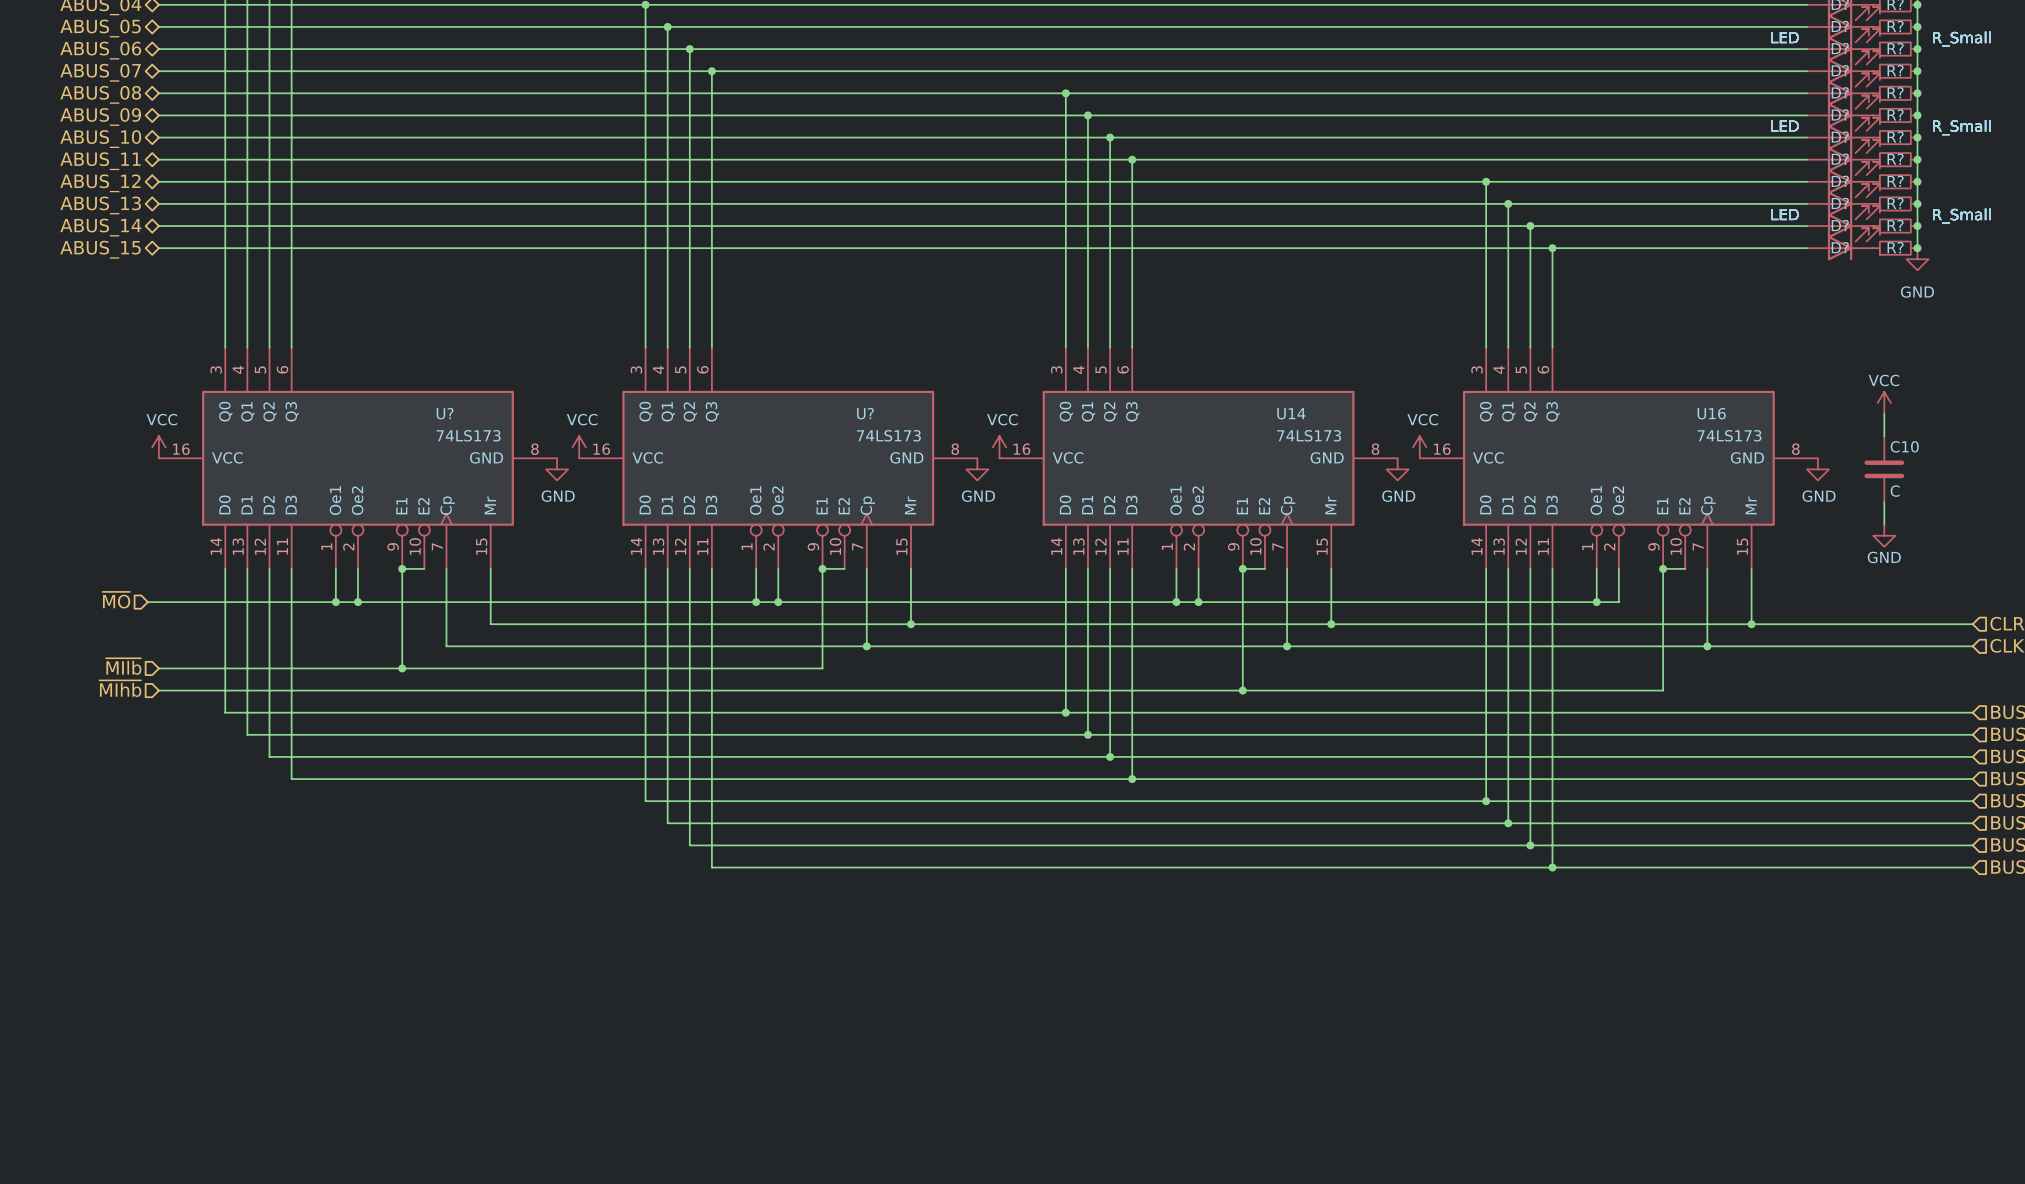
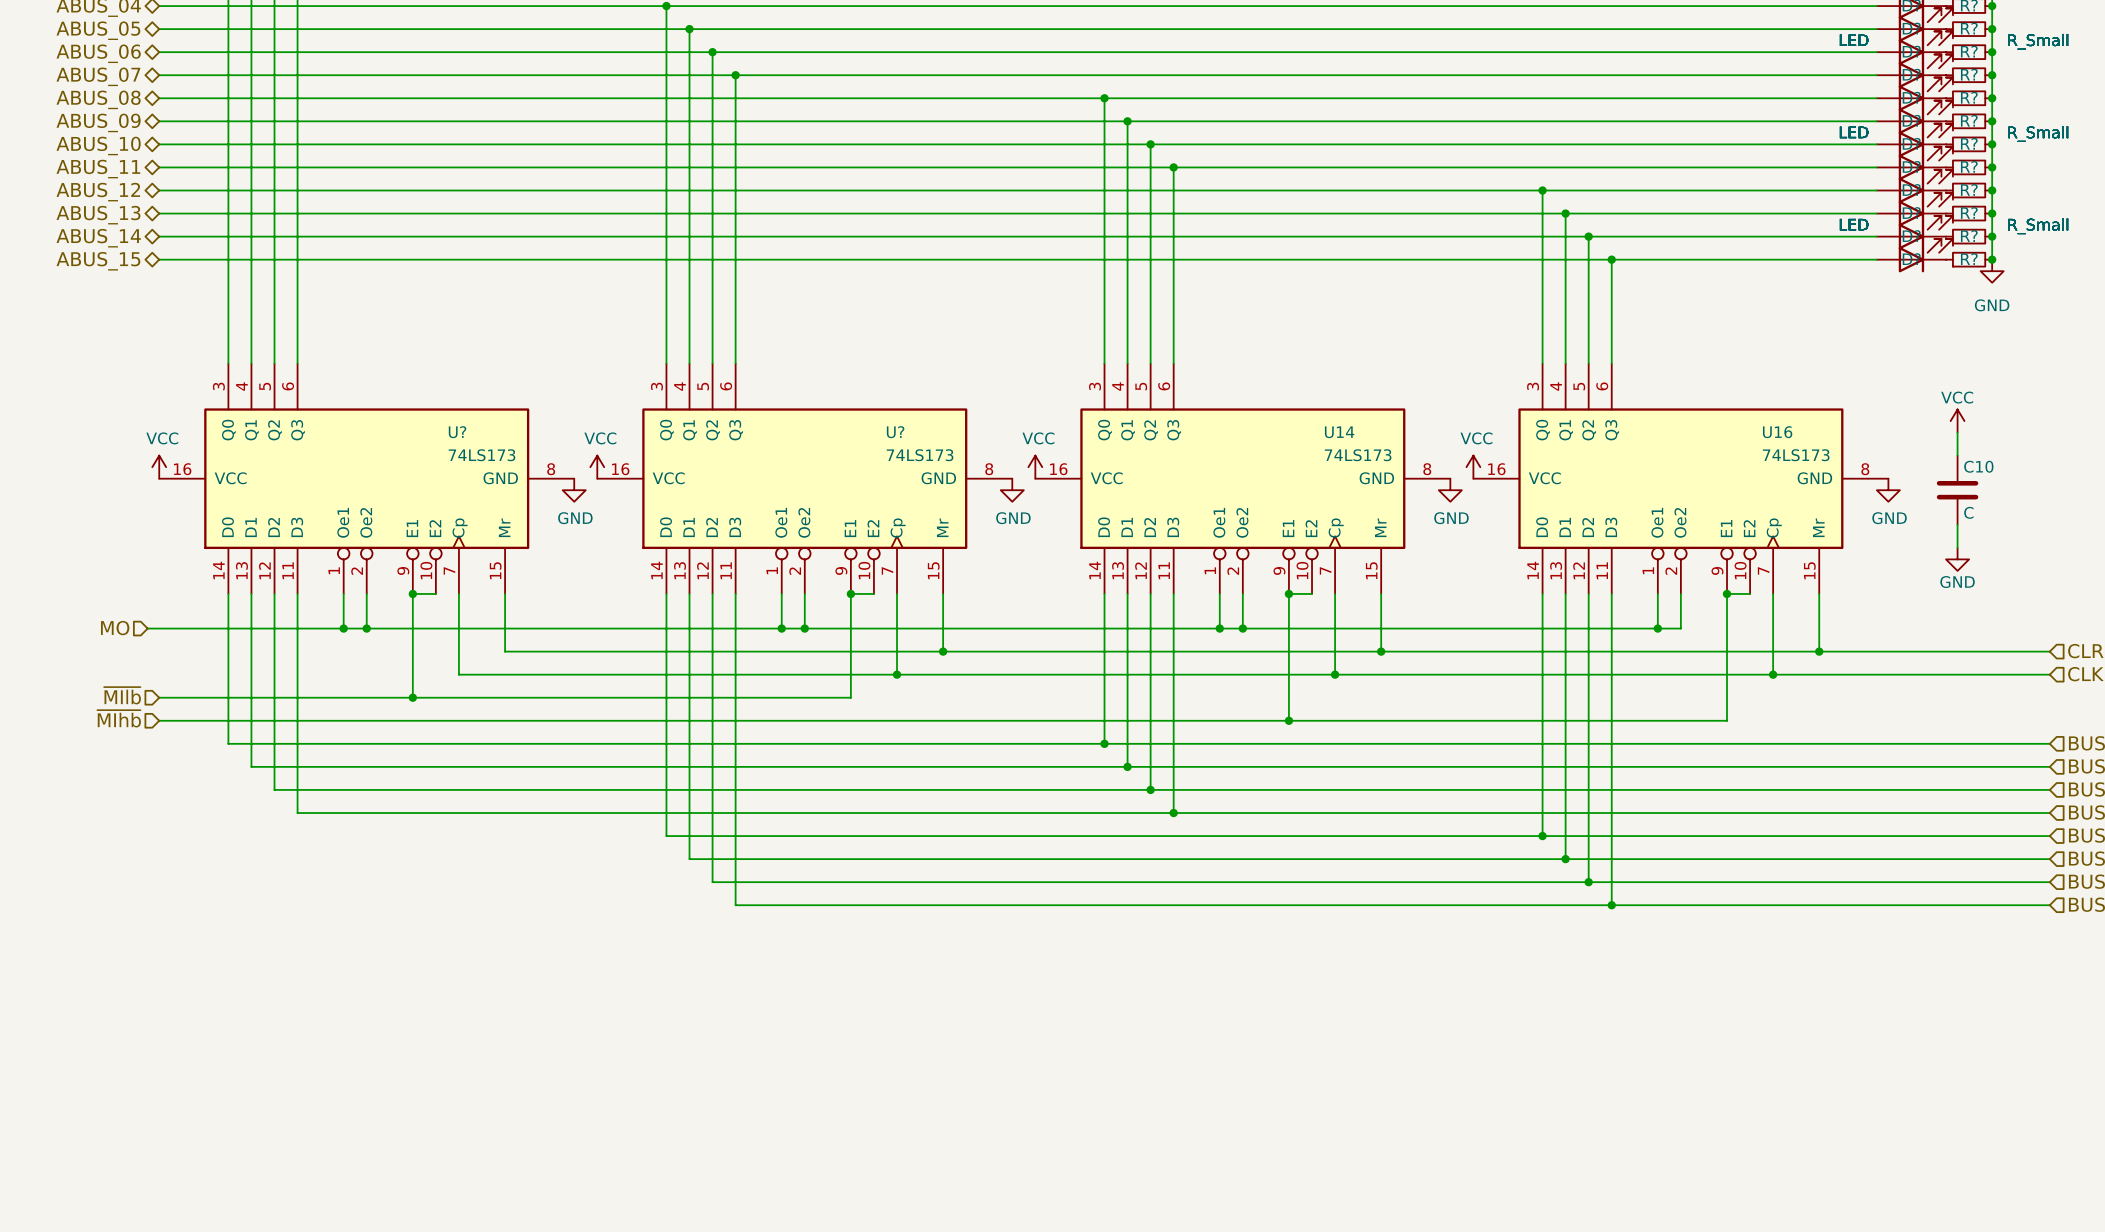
hierarchical label: ~{MO} (116, 600) -> MO (115, 628)

